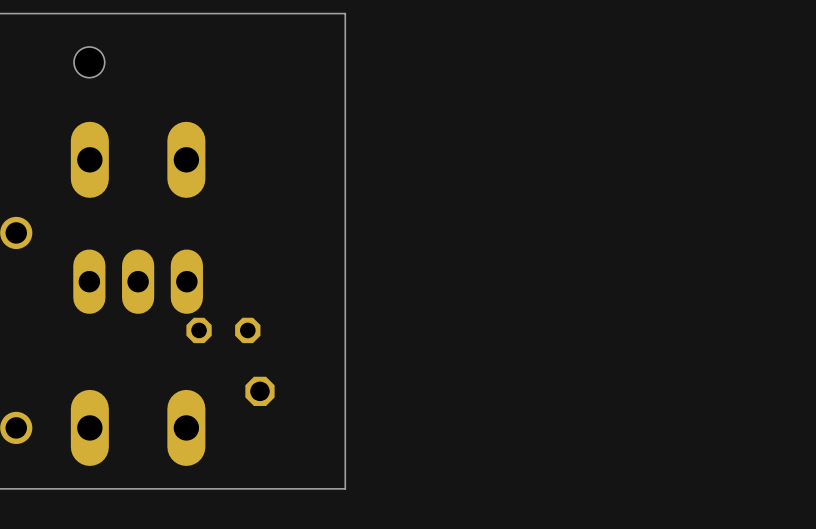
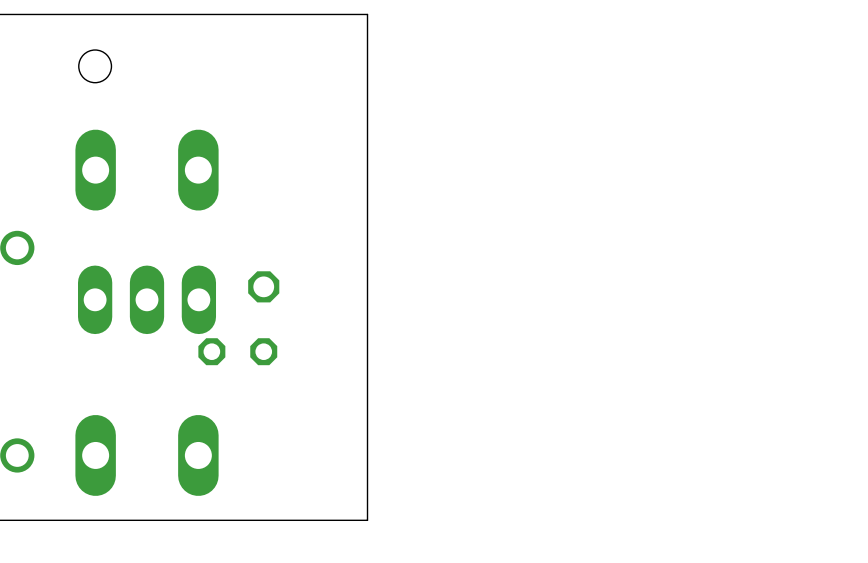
part position: (259, 391) -> (263, 286)

